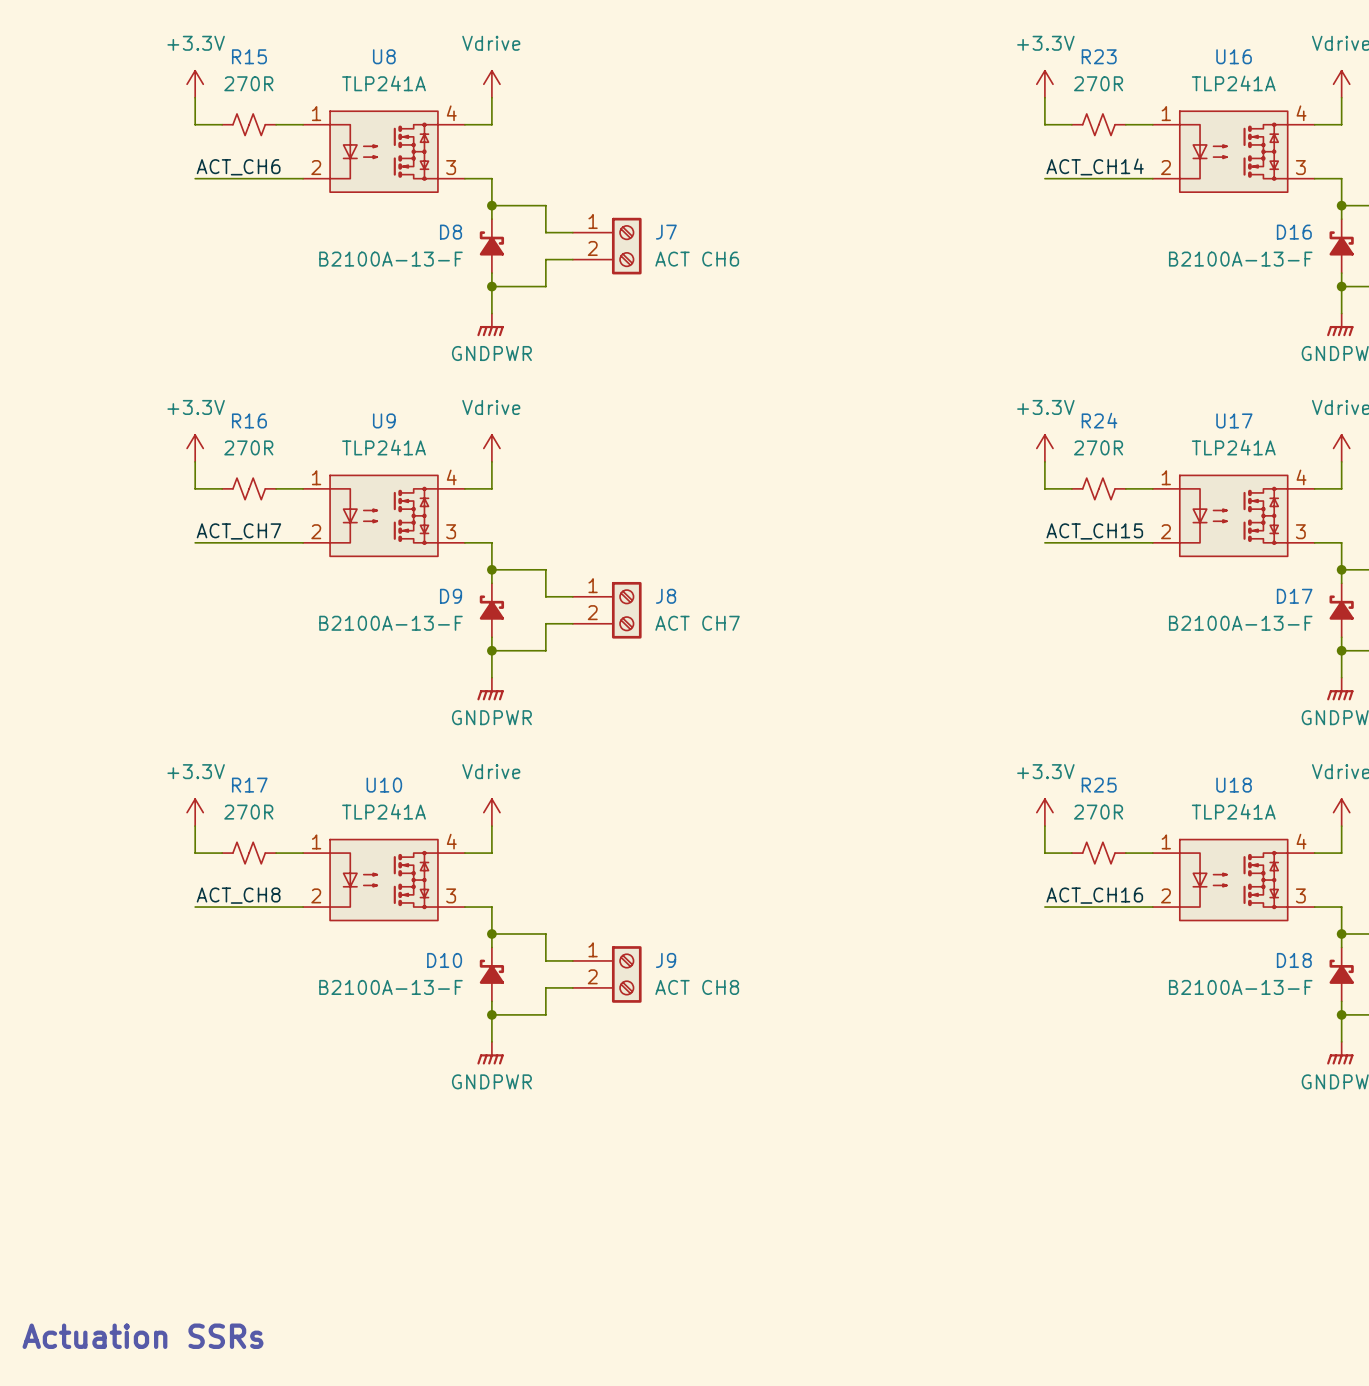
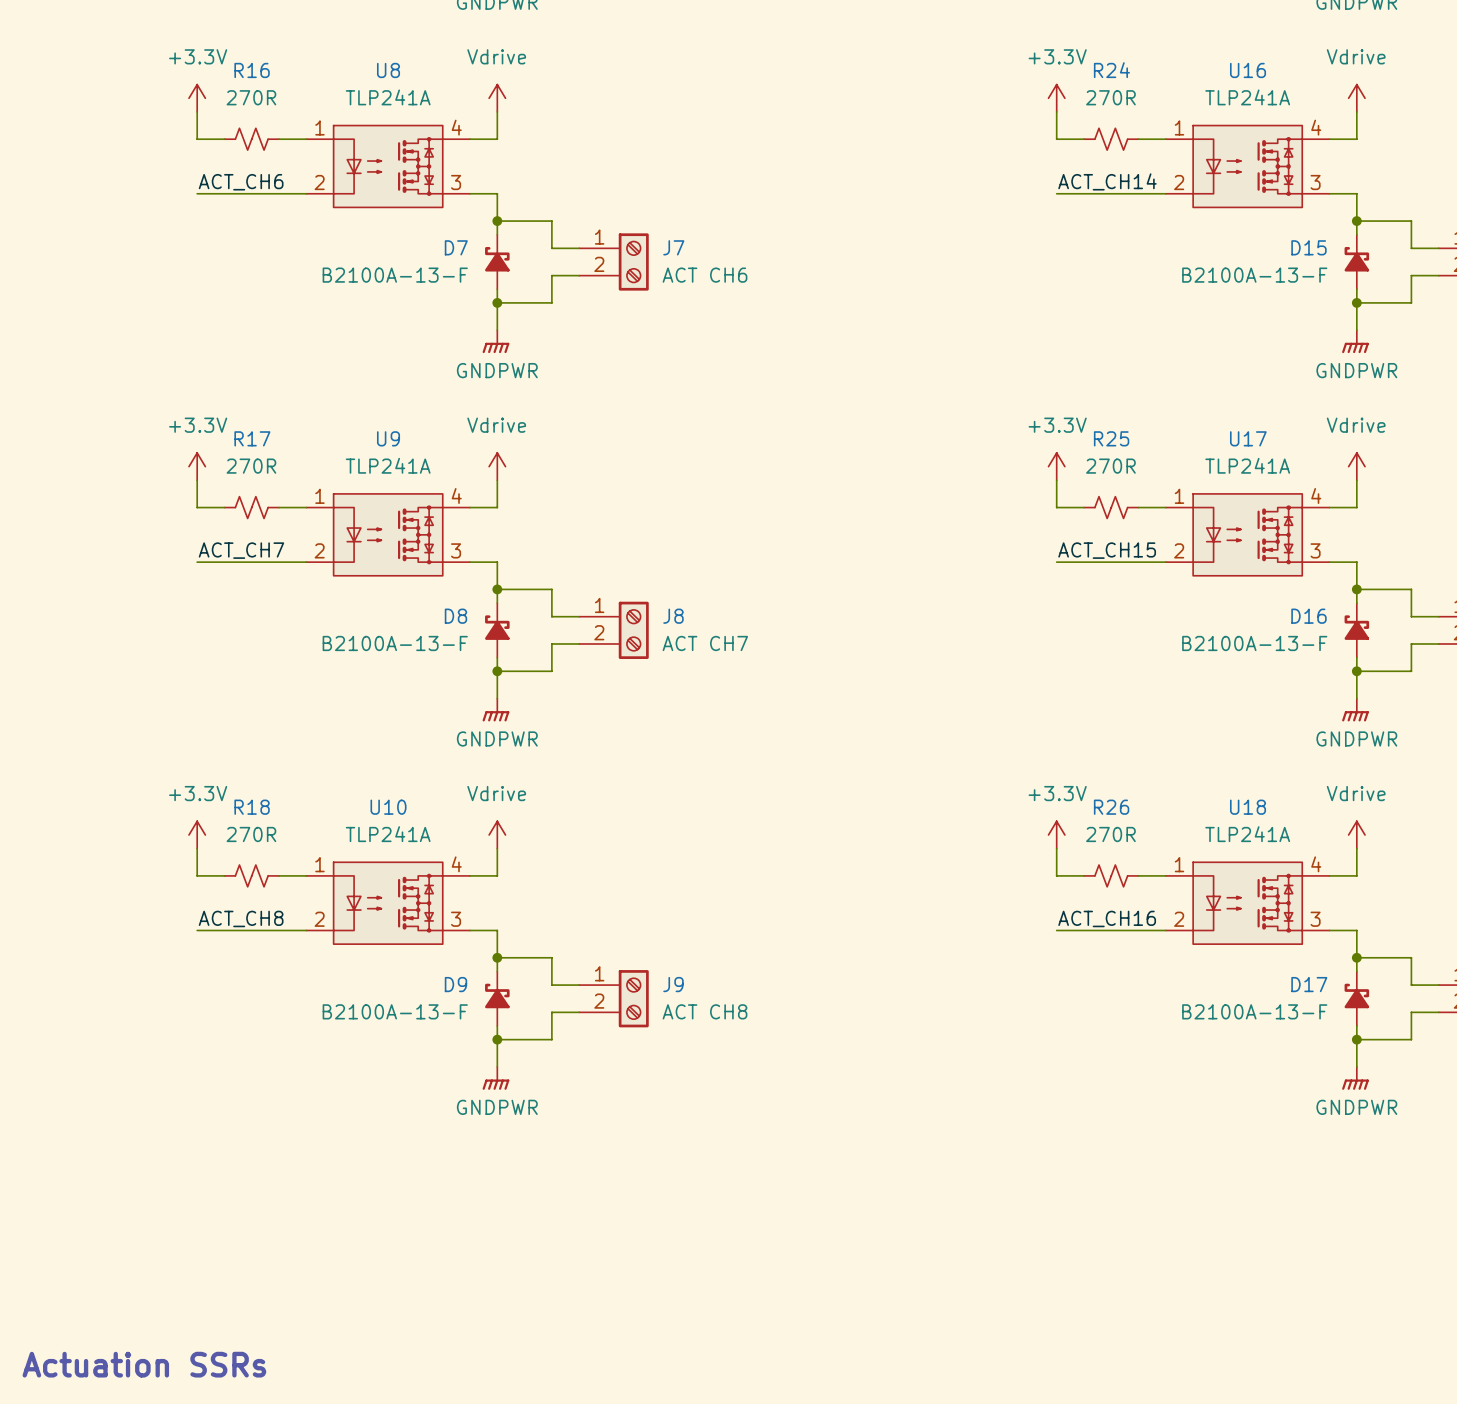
R15 name: R15 (249, 56) -> R16 (252, 70)
R23 name: R23 (1099, 56) -> R24 (1111, 70)
D8 name: D8 (451, 232) -> D7 (456, 247)
D16 name: D16 (1294, 232) -> D15 (1308, 247)
R16 name: R16 (249, 420) -> R17 (252, 438)
R24 name: R24 (1099, 420) -> R25 (1111, 438)
D9 name: D9 (451, 596) -> D8 (455, 616)
D17 name: D17 (1294, 596) -> D16 (1308, 616)
R17 name: R17 (249, 785) -> R18 (252, 807)
R25 name: R25 (1099, 785) -> R26 (1111, 807)
D10 name: D10 (444, 960) -> D9 (455, 984)
D18 name: D18 (1294, 960) -> D17 (1309, 984)

